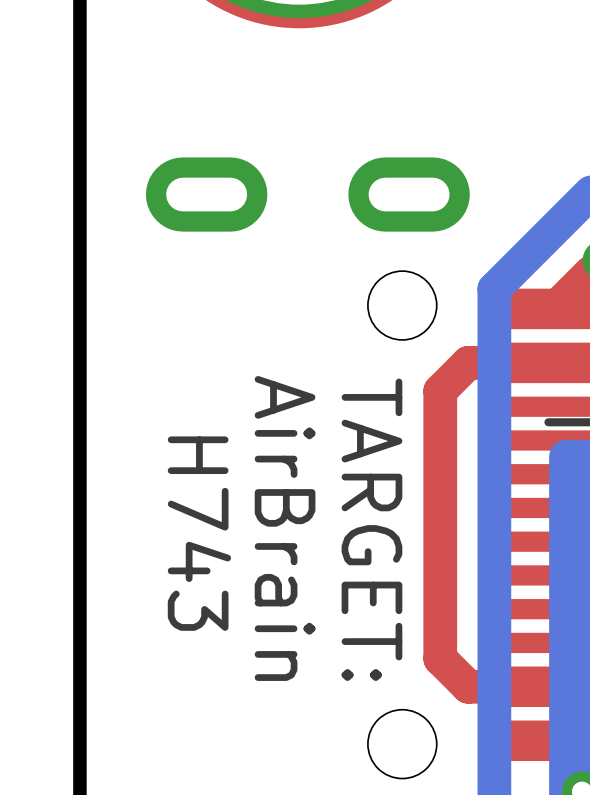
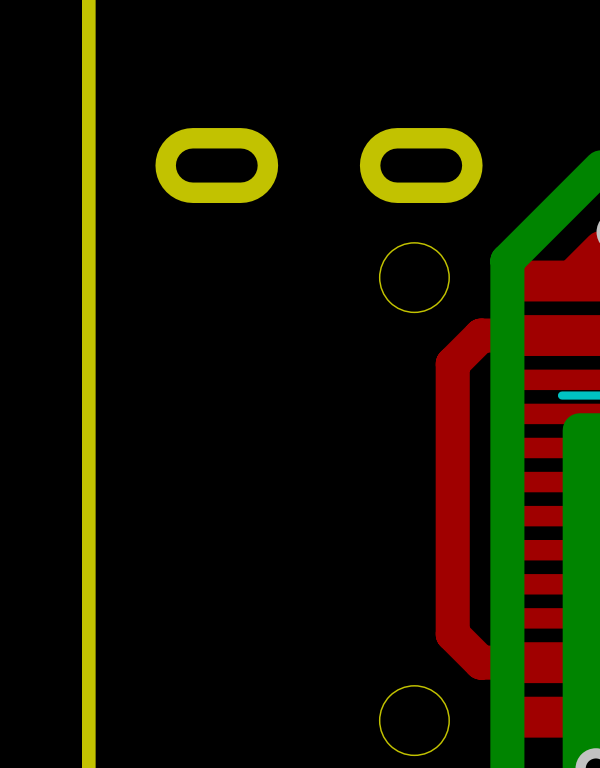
text: AirBrain (285, 528) -> none
text: TARGET: (371, 529) -> none
text: H743 (199, 533) -> none

